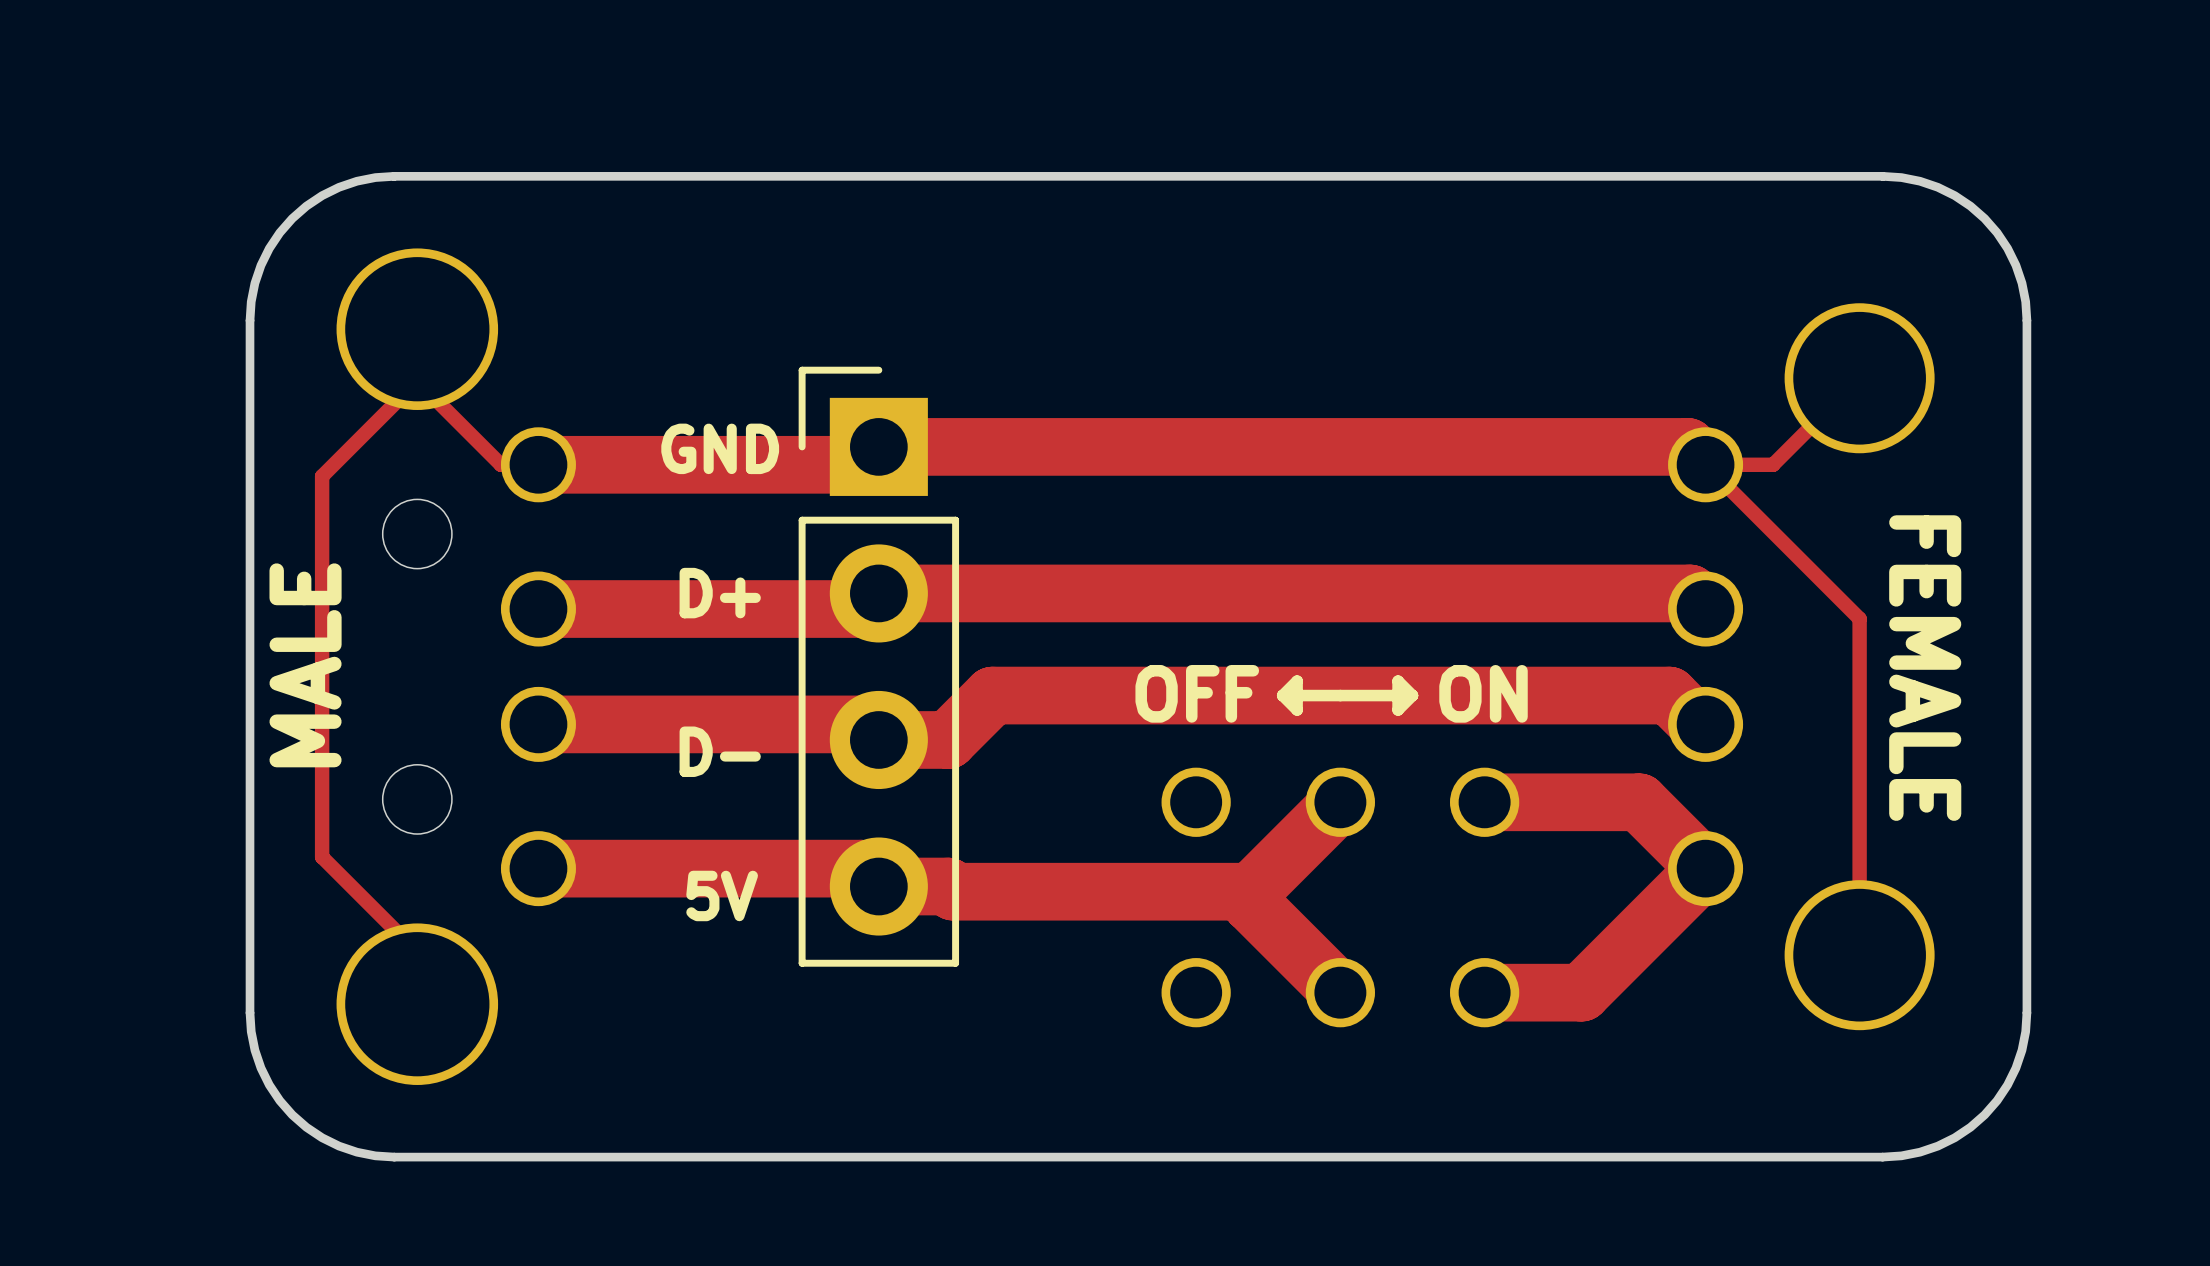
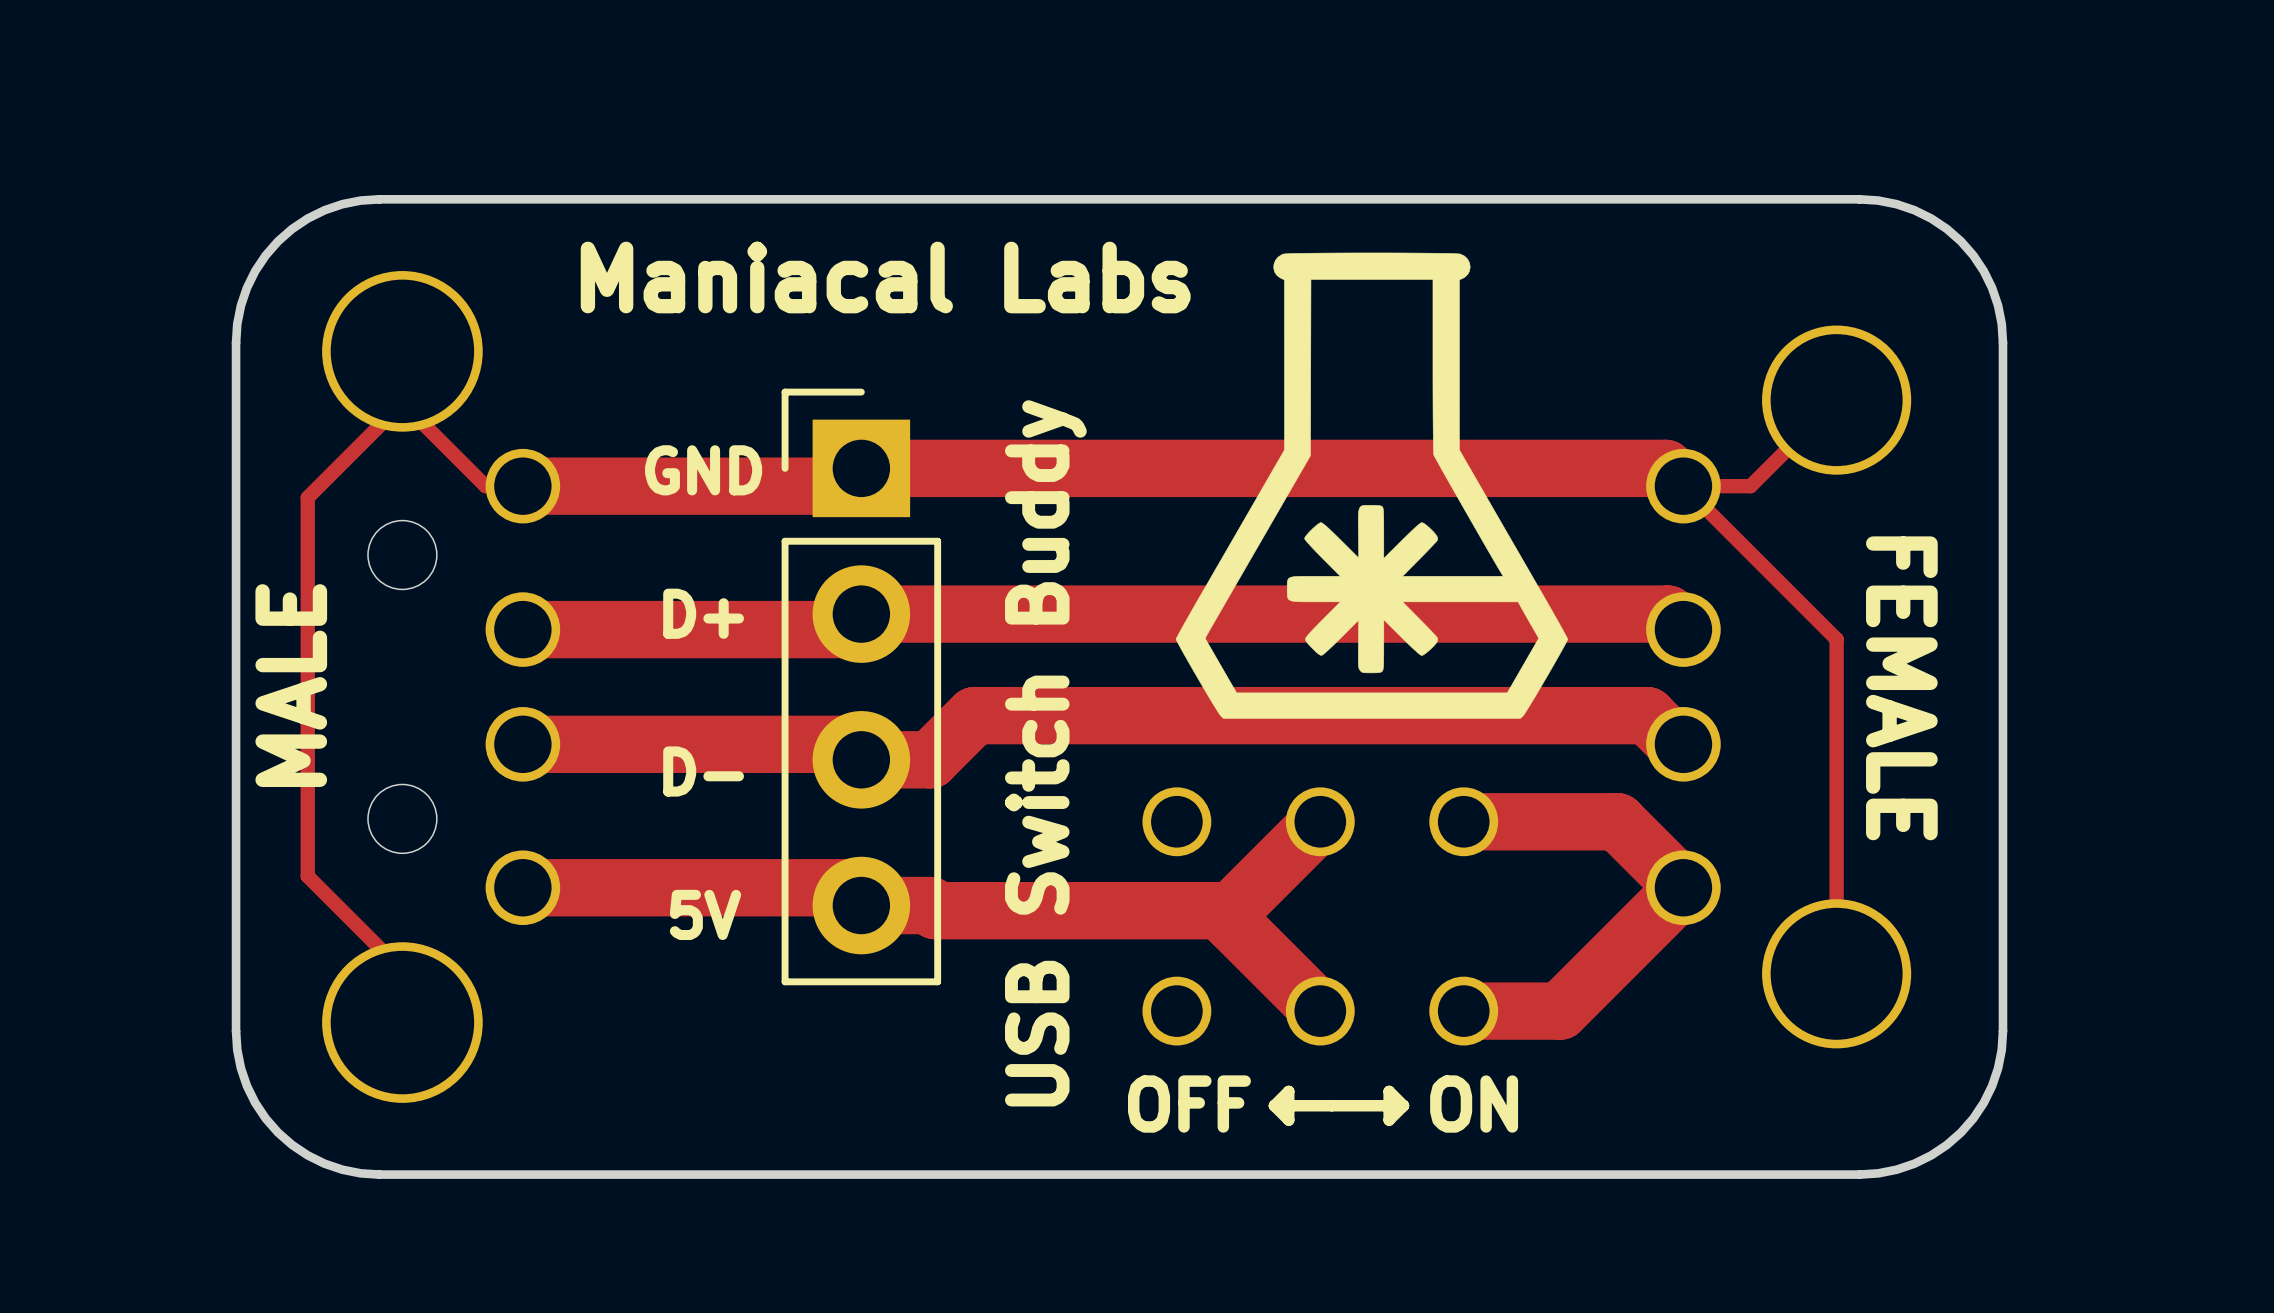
drawing: none -> [1175, 252, 1569, 719]
text: none -> Maniacal Labs (885, 277)
text position: OFF (1197, 693) -> OFF (1189, 1104)
text position: ON (1483, 693) -> ON (1474, 1104)
line: (1282, 695) (1297, 709) (1297, 681) (1282, 695) -> (1274, 1105) (1288, 1120) (1288, 1091) (1274, 1105)
line: (1282, 695) (1412, 695) -> (1274, 1105) (1403, 1105)
line: (1412, 695) (1398, 709) (1398, 681) (1412, 695) -> (1403, 1105) (1389, 1120) (1389, 1091) (1403, 1105)
text: none -> USB Switch Buddy (1045, 753)

